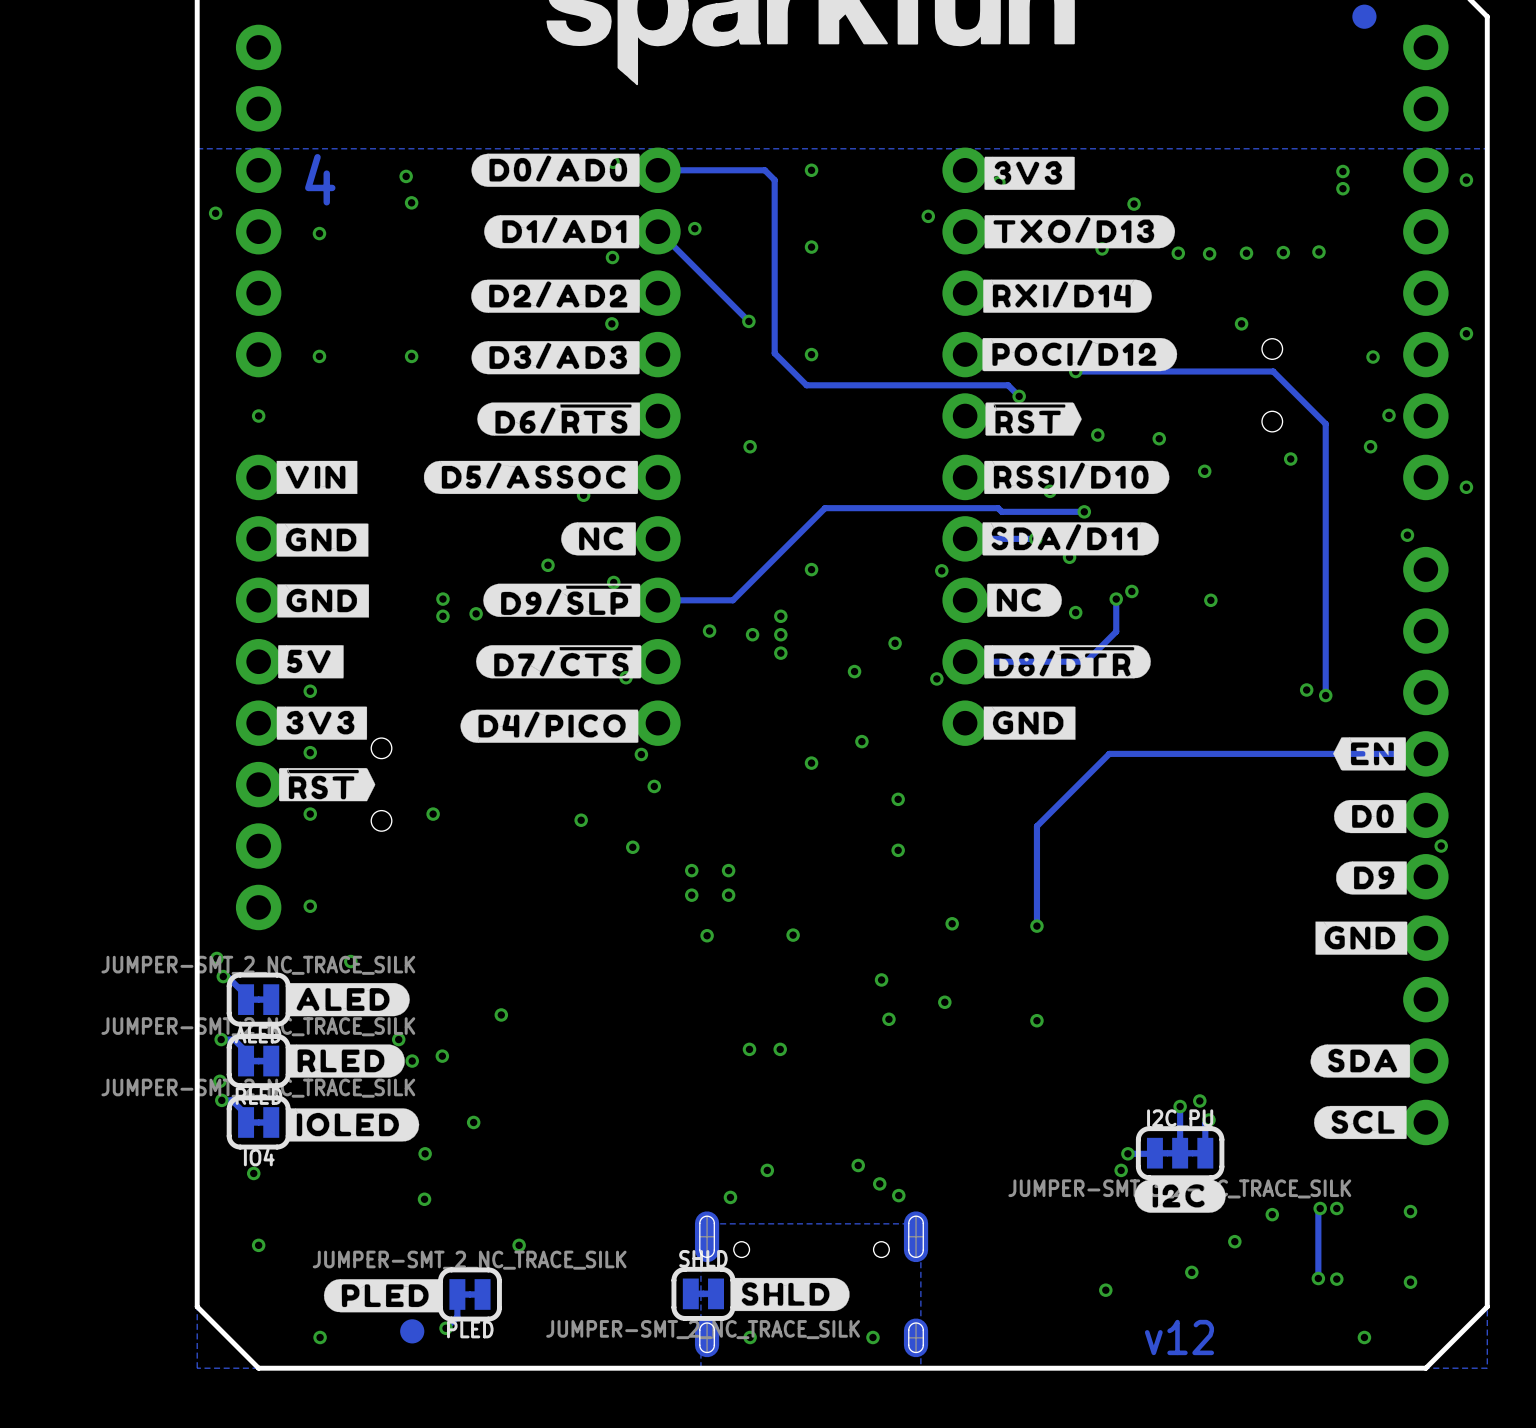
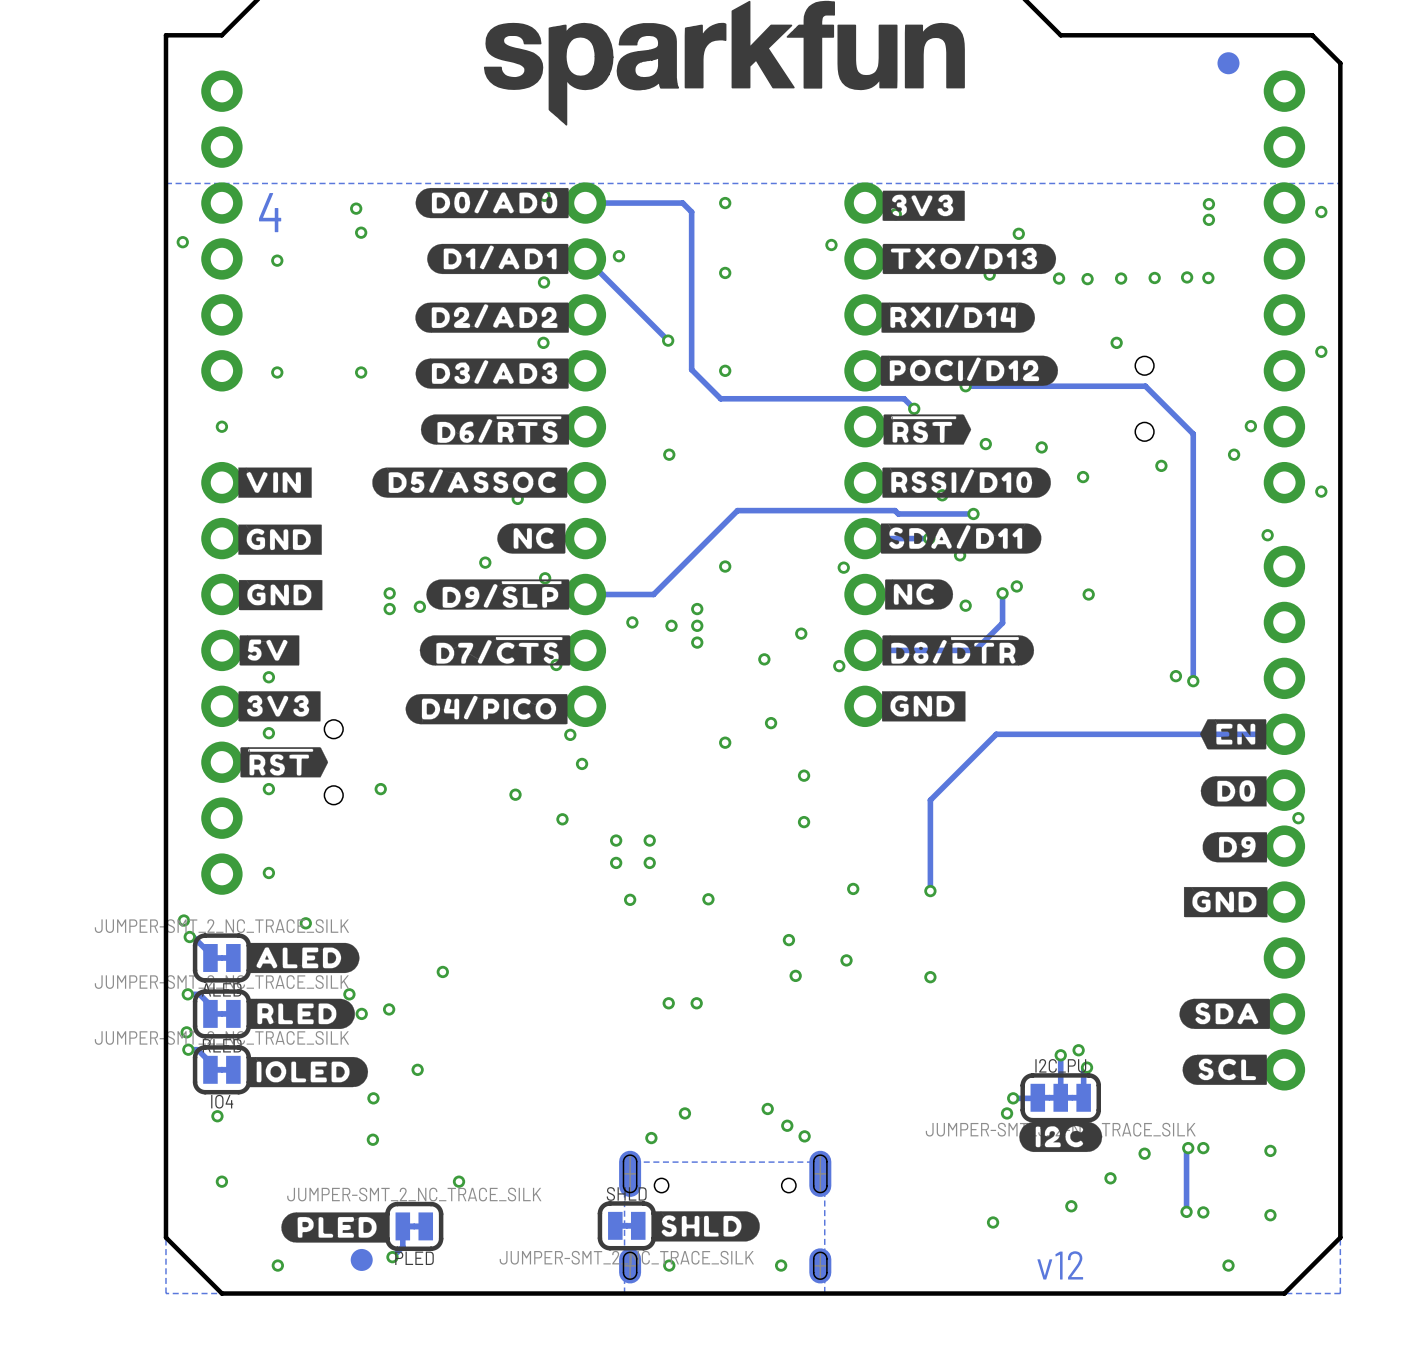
via position: (1373, 357) -> (1208, 277)

